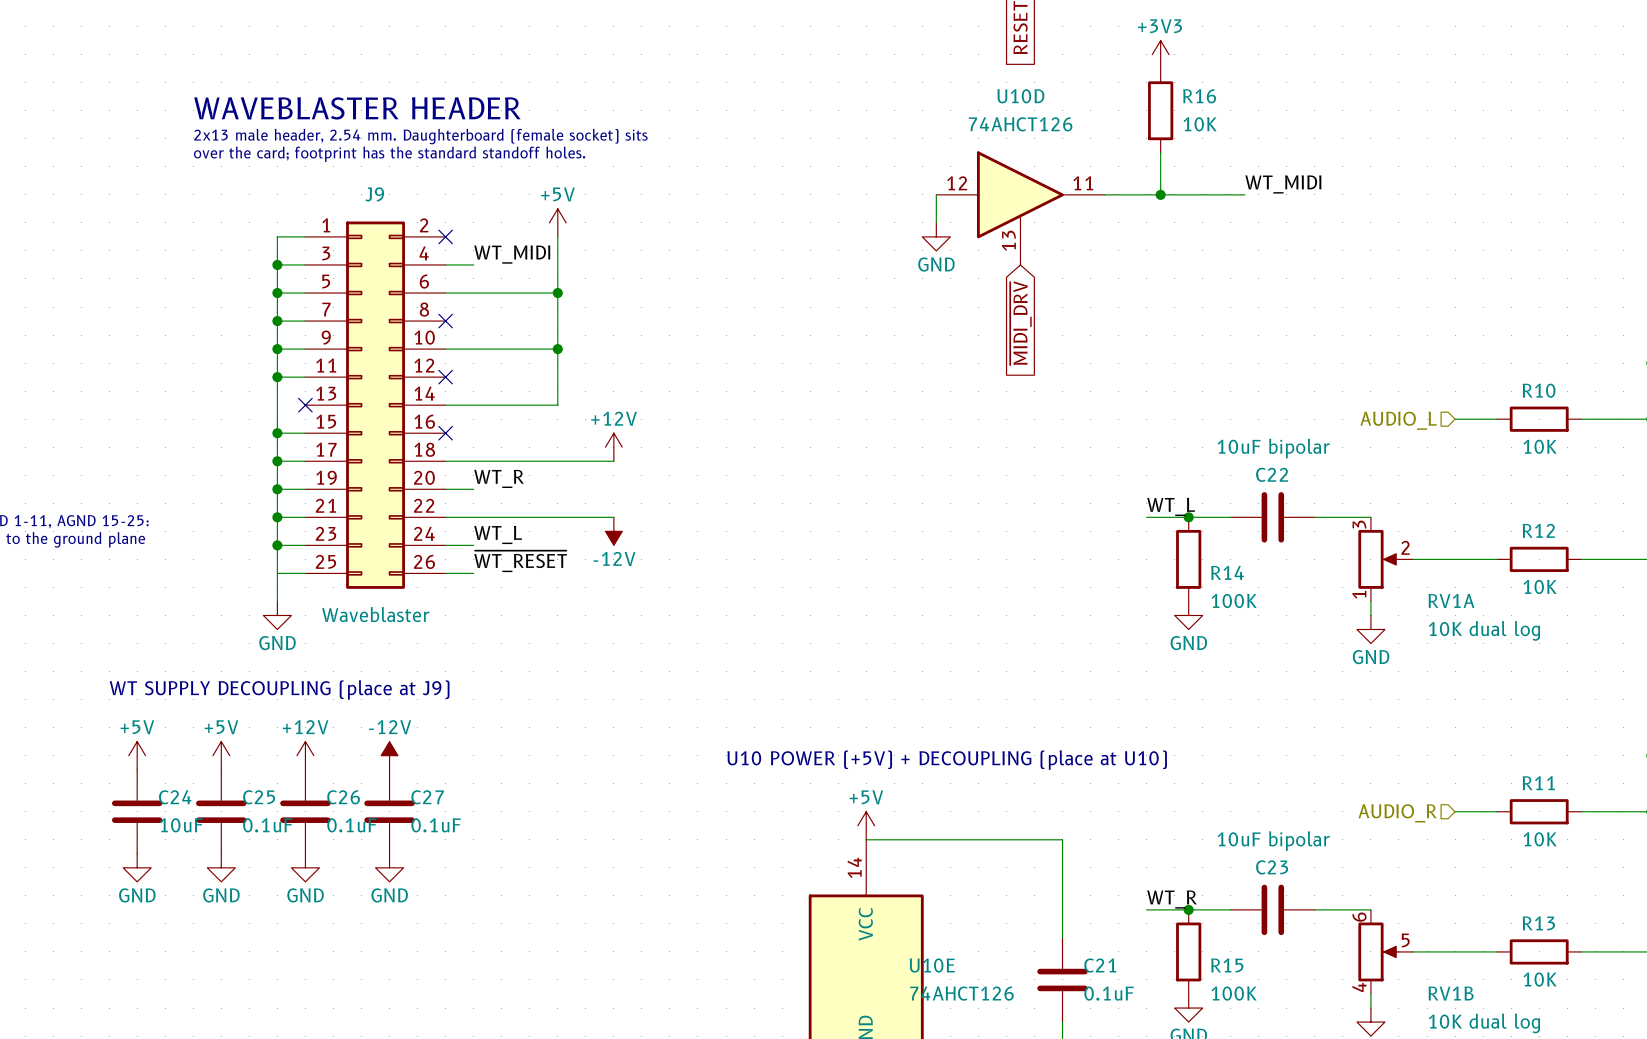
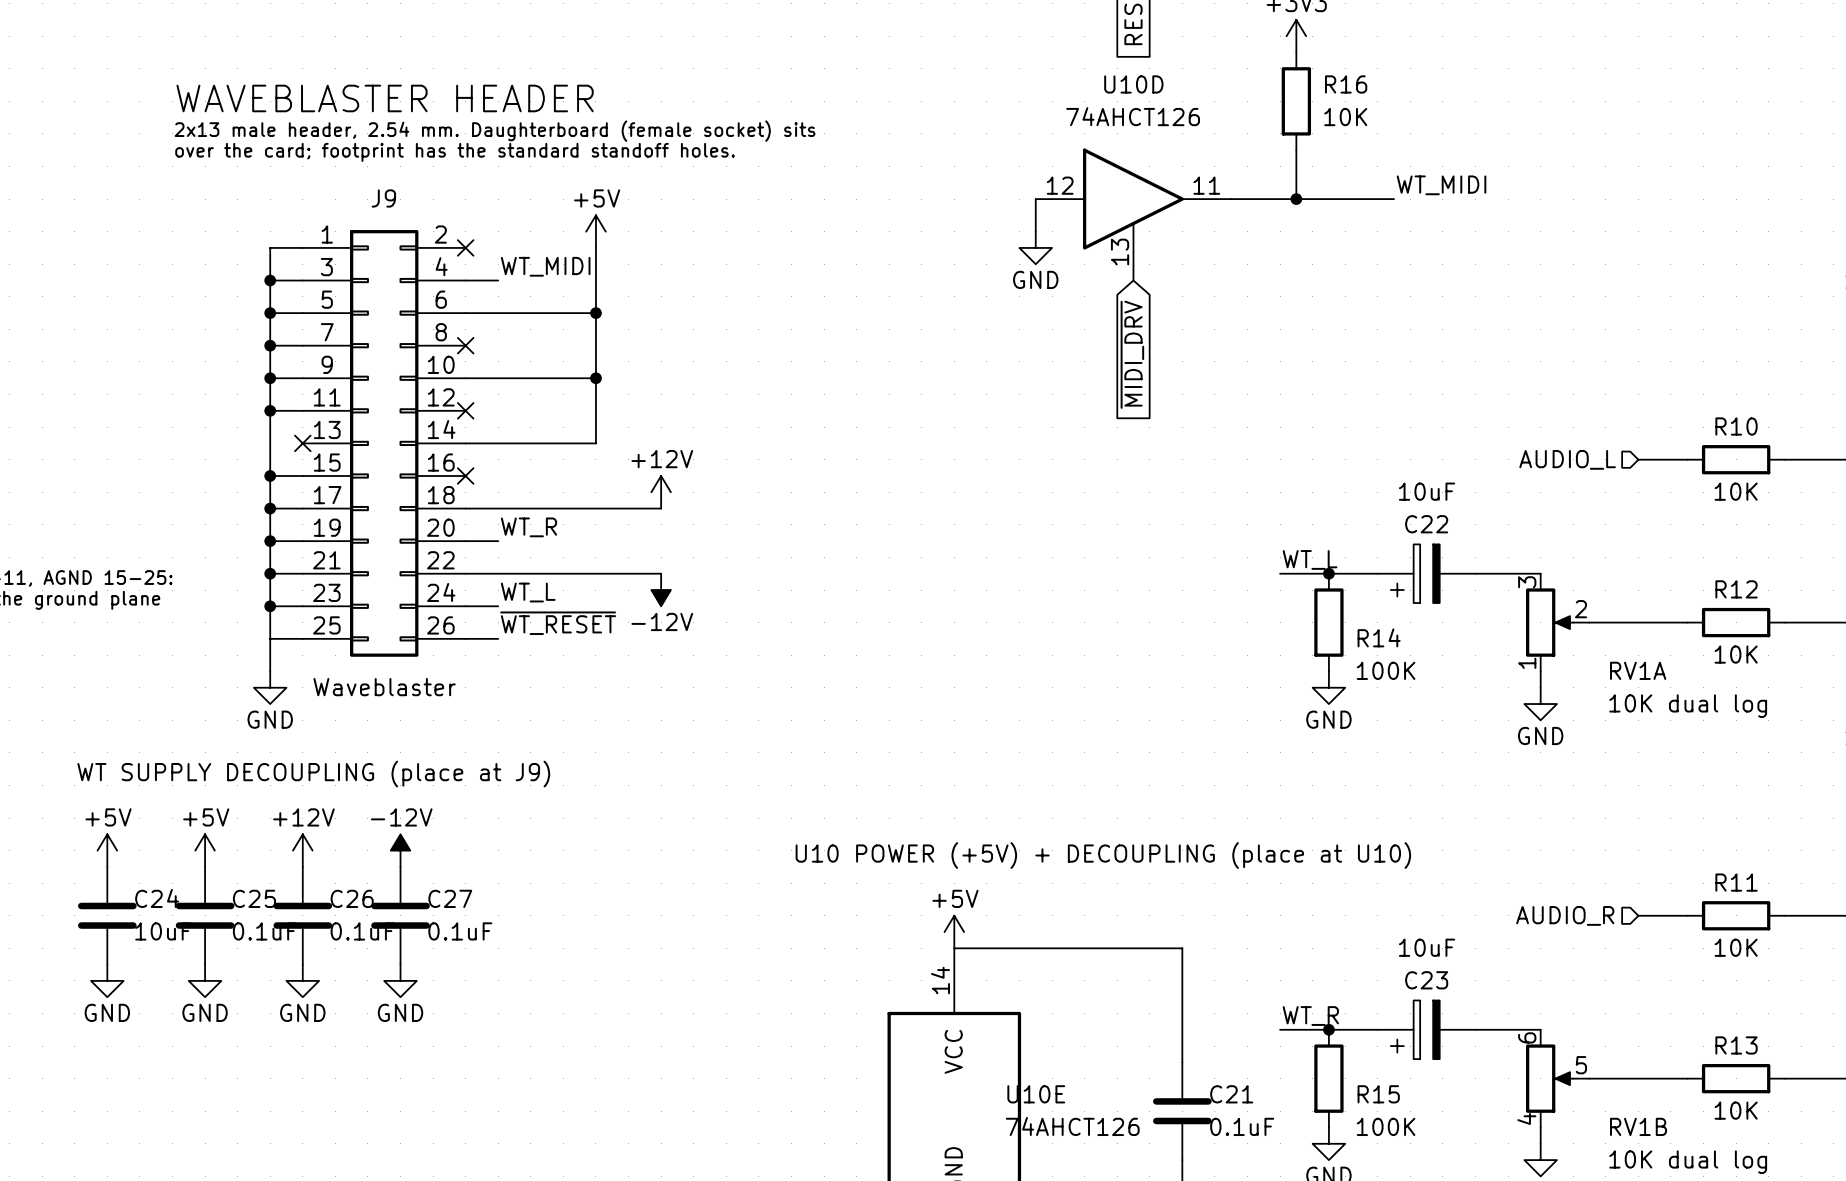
C22 value: 10uF bipolar (1273, 448) -> 10uF (1427, 491)
C22 symbol: [1230, 492, 1315, 543] -> [1377, 544, 1476, 604]
C23 value: 10uF bipolar (1273, 841) -> 10uF (1427, 947)
C23 symbol: [1230, 884, 1315, 936] -> [1377, 1000, 1476, 1060]

